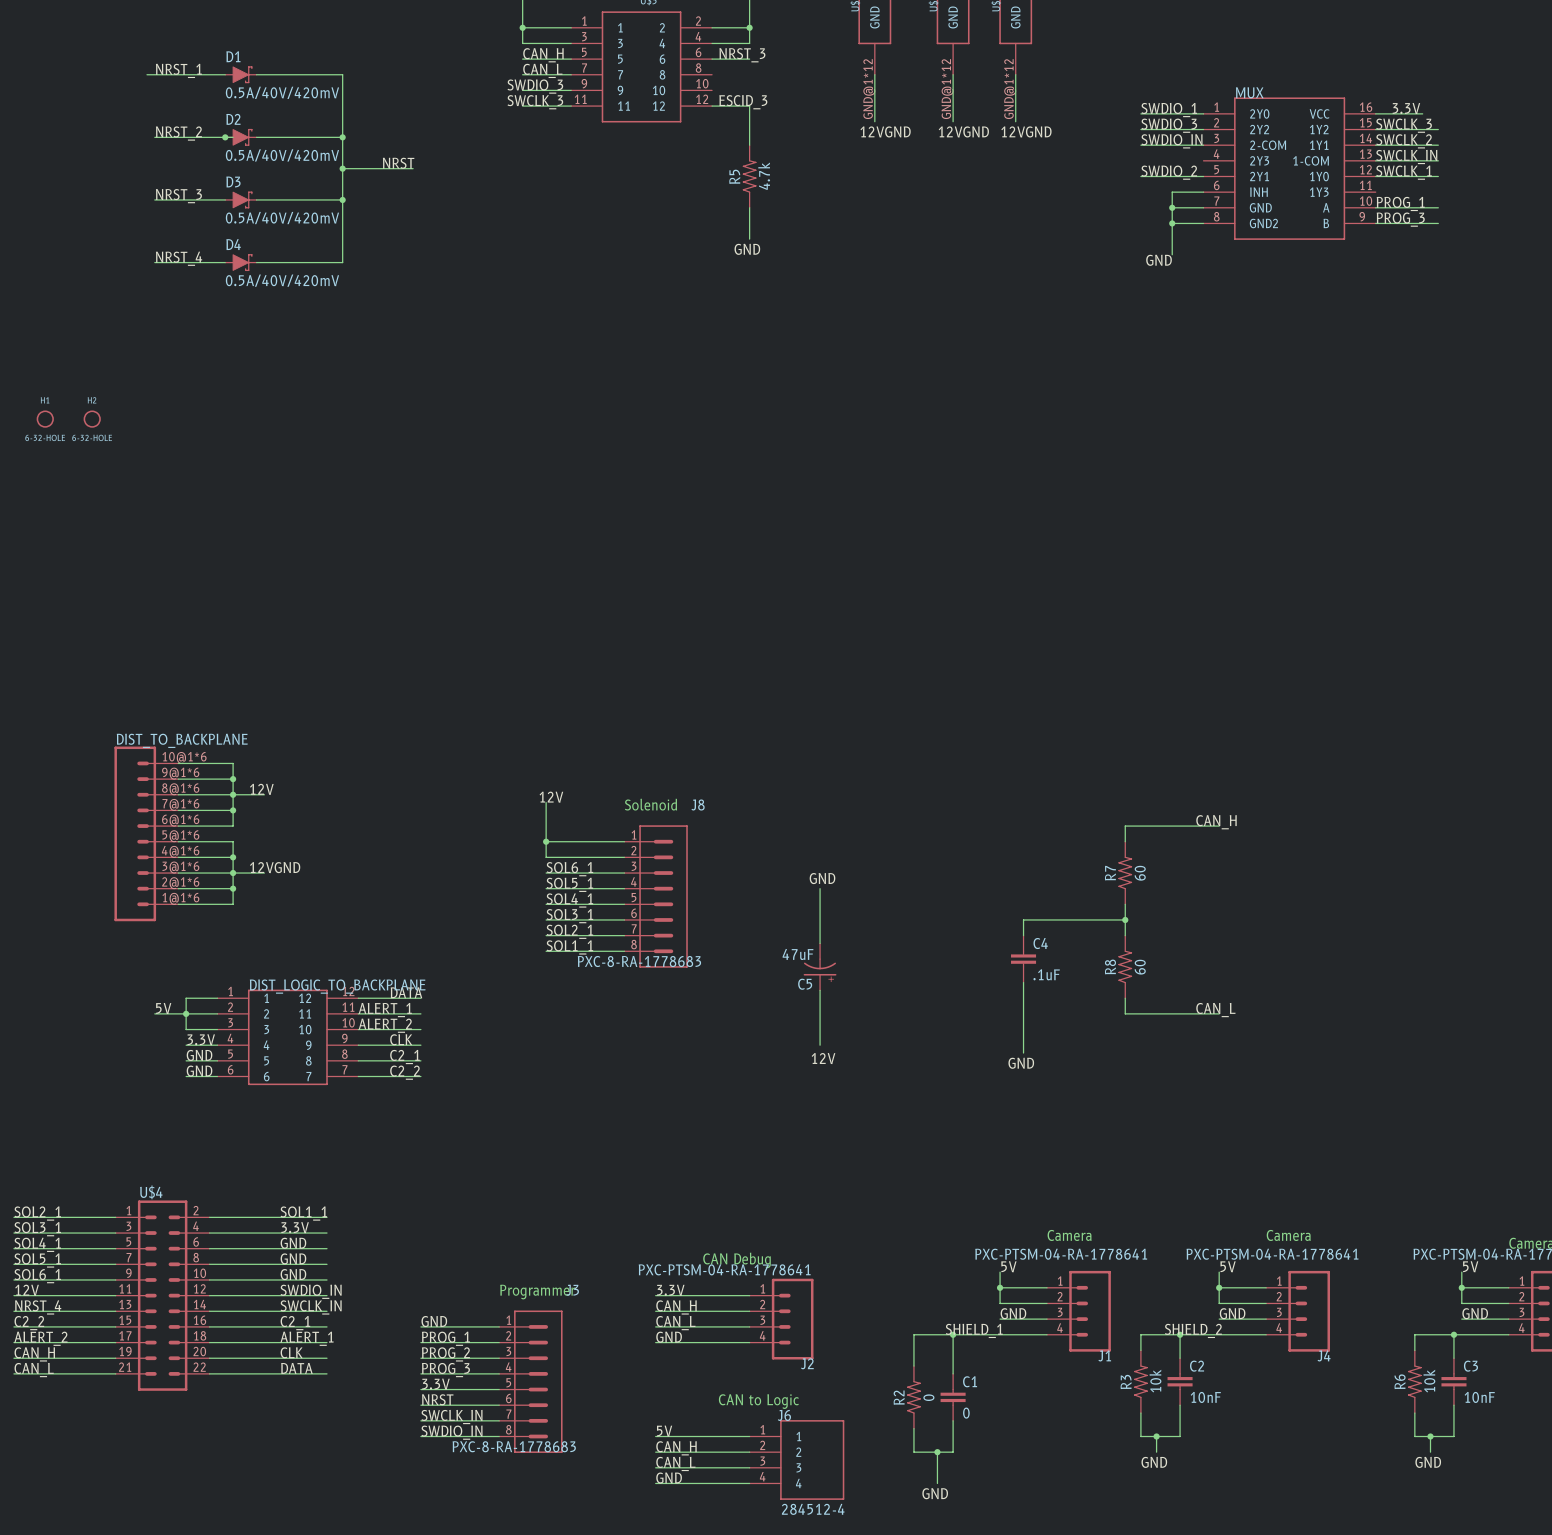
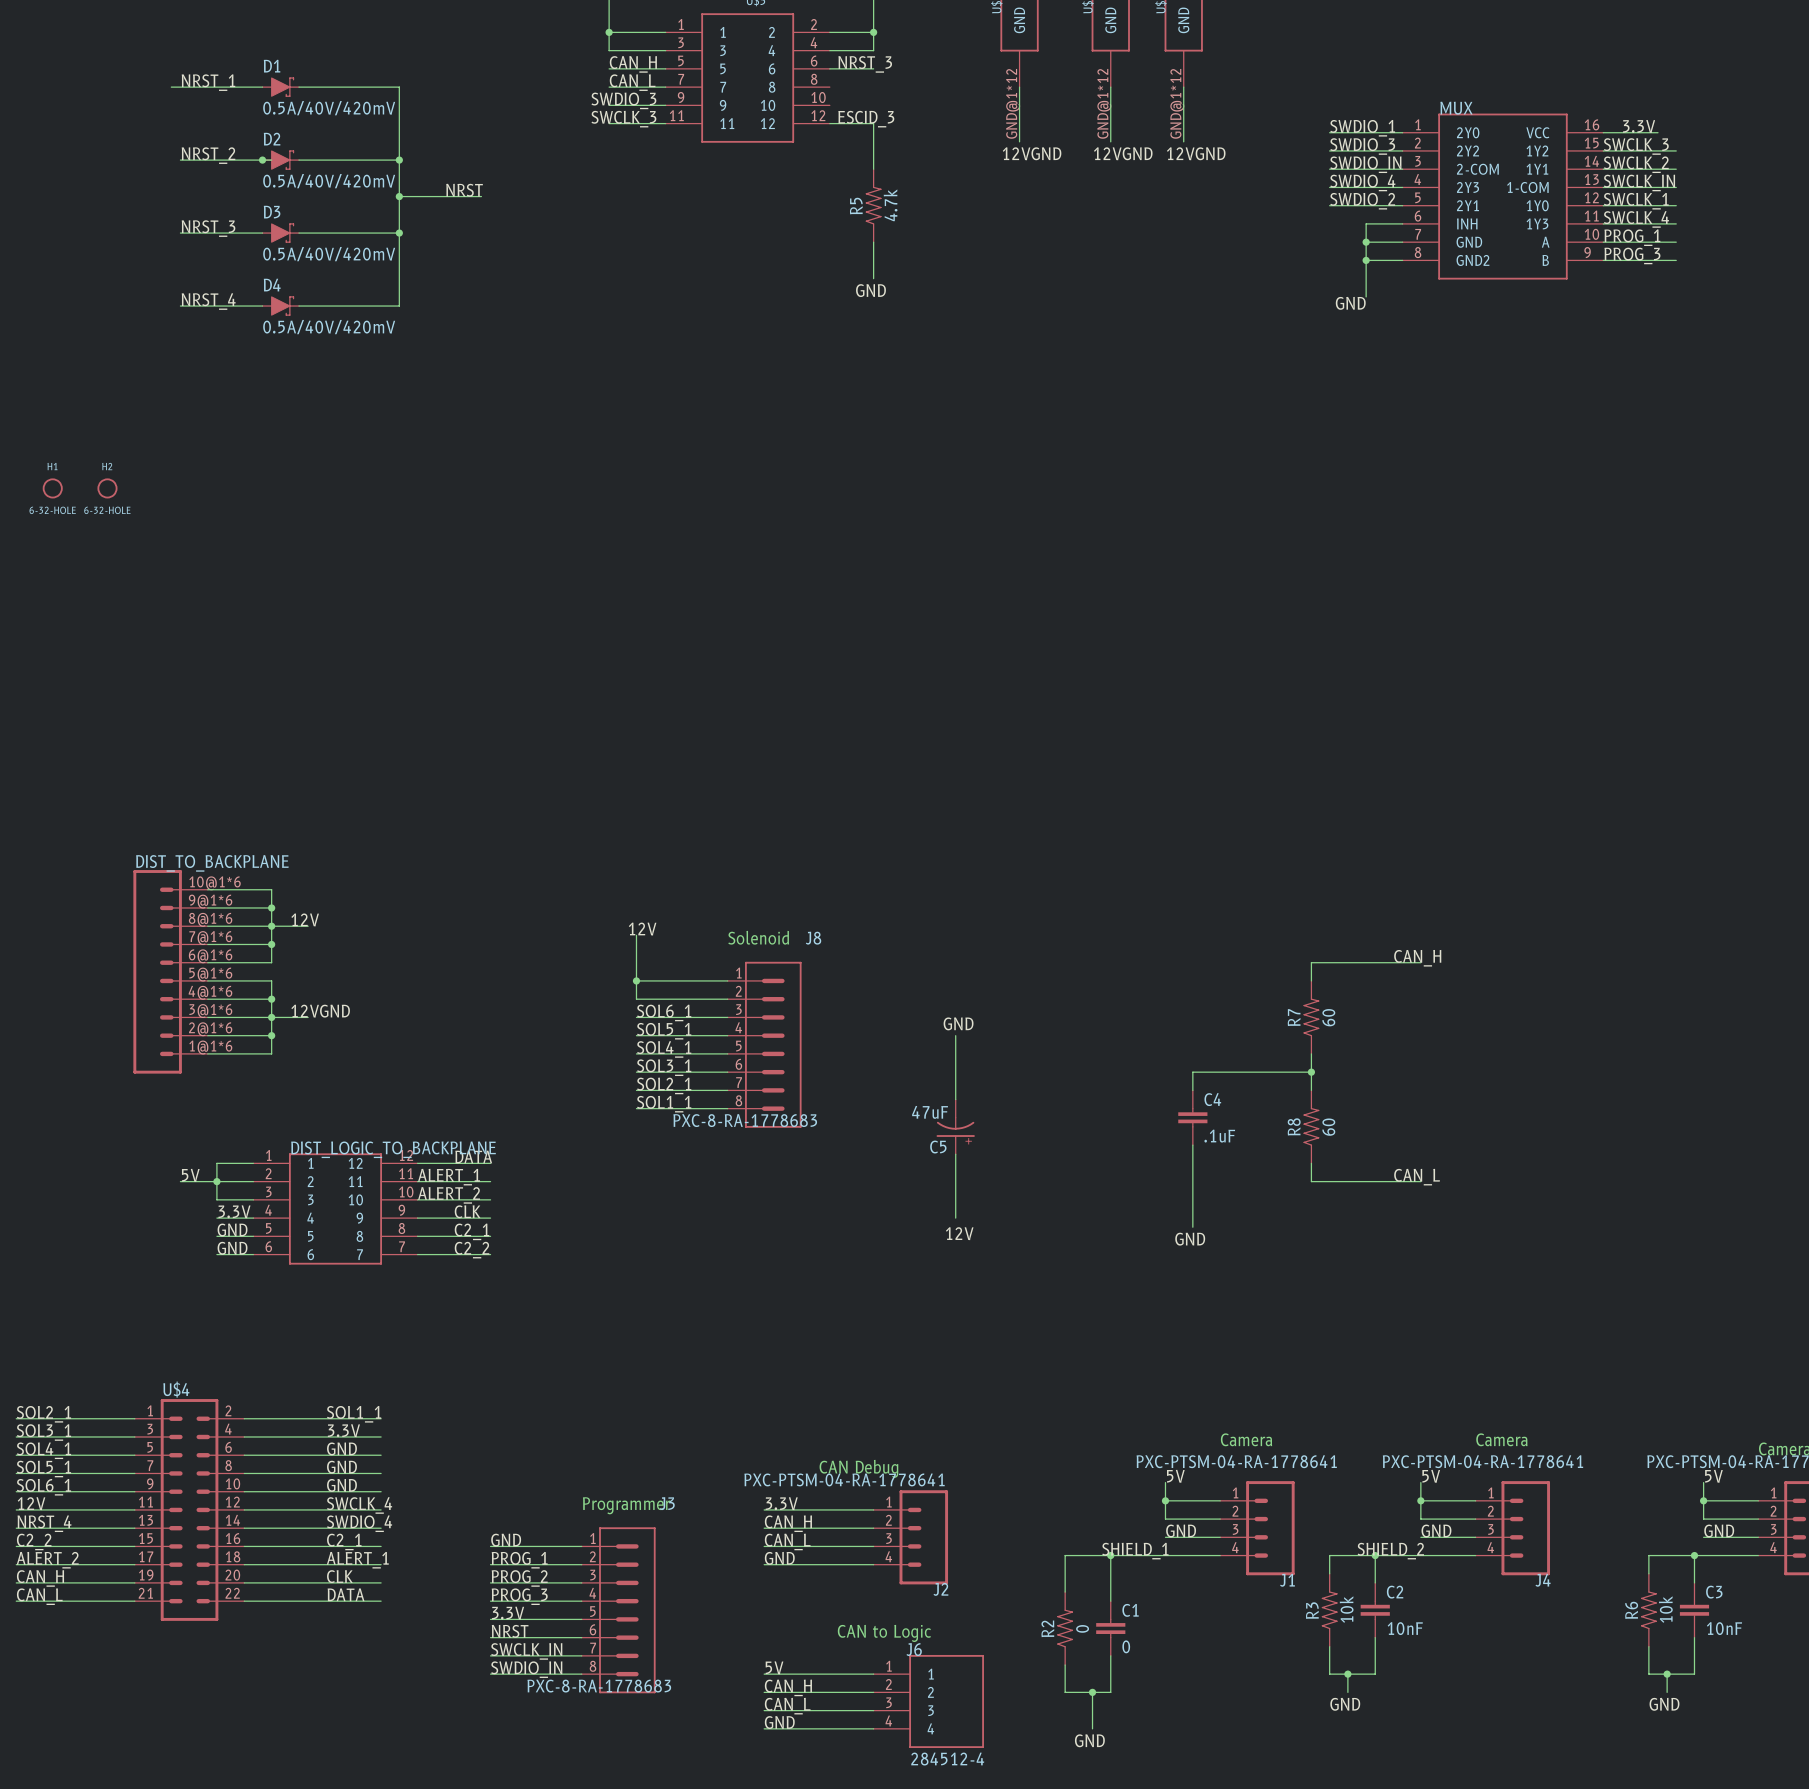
label: none -> SWDIO_4 (1362, 182)
wire: none -> (1329, 187) (1402, 187)
label: none -> SWCLK_4 (1636, 219)
wire: none -> (1603, 223) (1676, 223)
label: SWDIO_IN (311, 1291) -> SWCLK_4 (359, 1505)
label: SWCLK_IN (311, 1307) -> SWDIO_4 (359, 1523)

